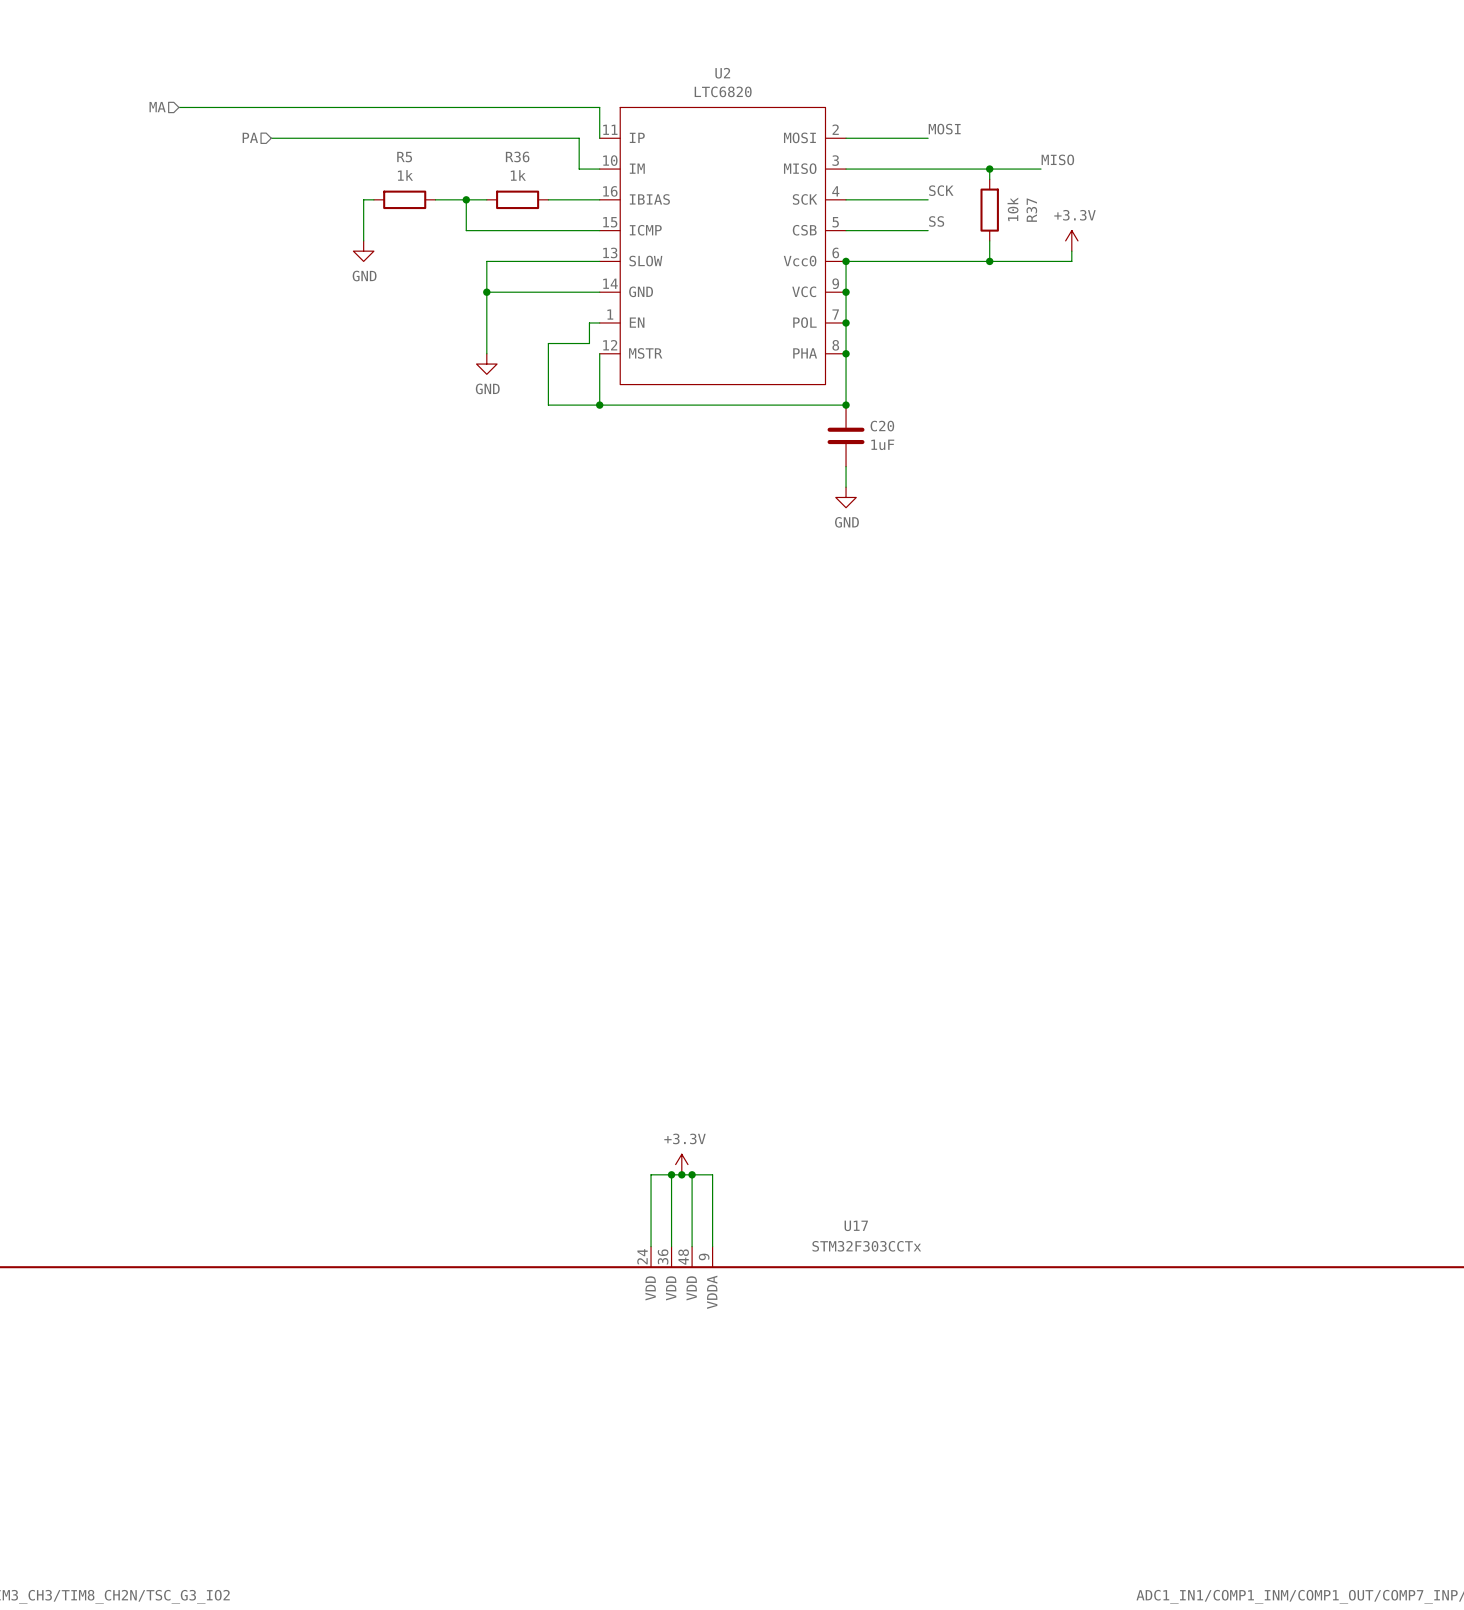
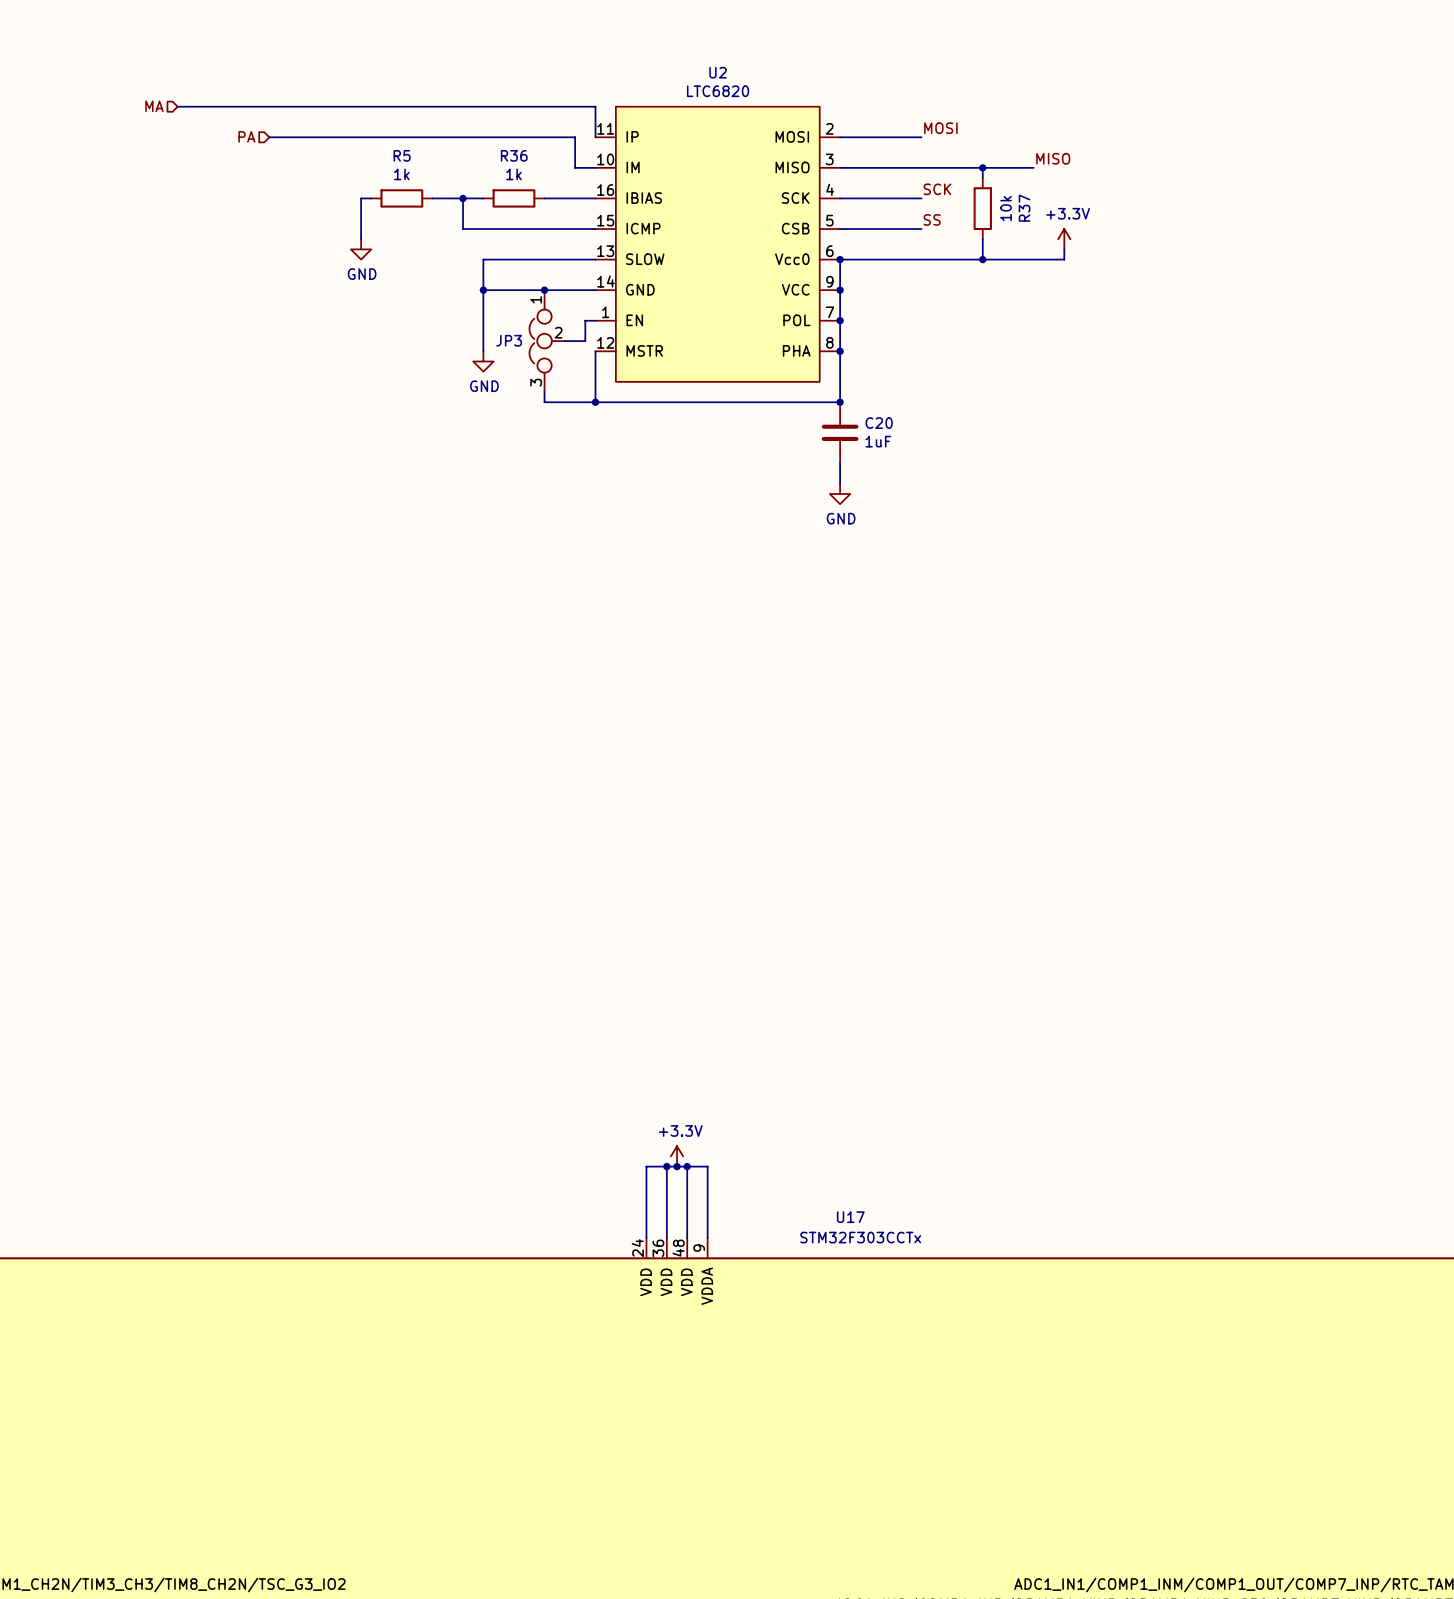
junction: none -> (544, 290)
JP3: none -> (547, 341)
wire: (568, 343) (548, 343) (548, 394) -> none

